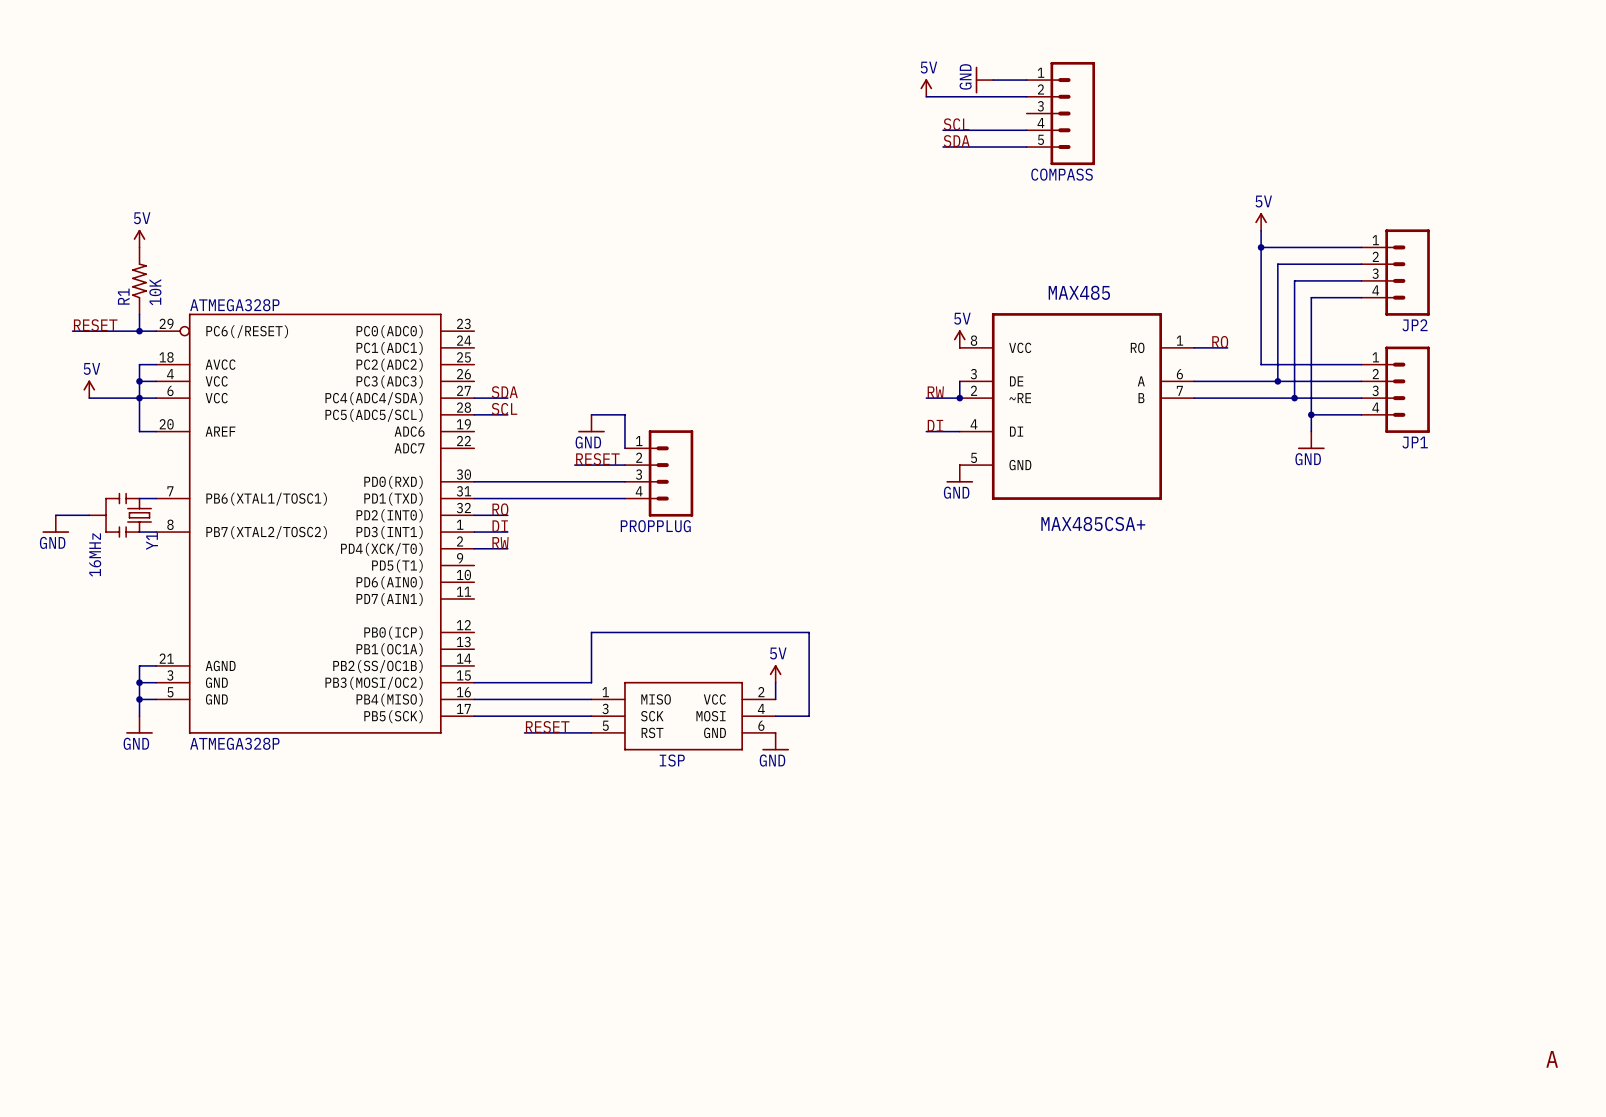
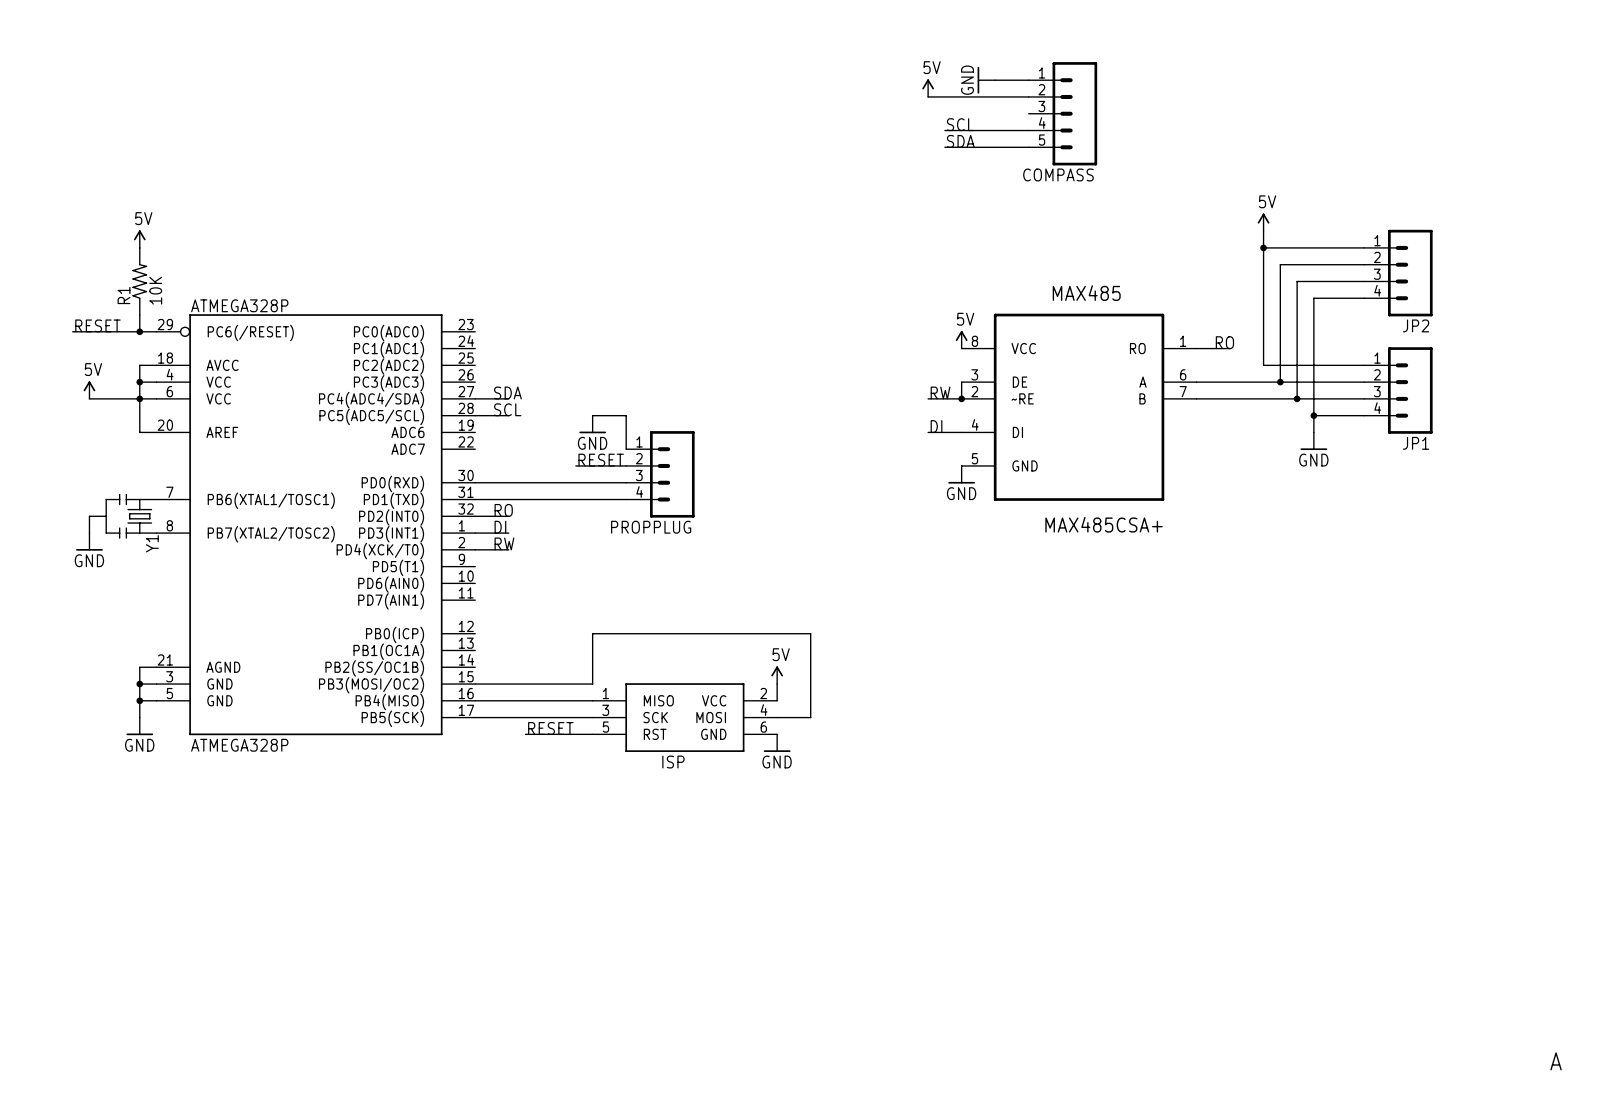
wire: (55, 515) (89, 515) -> (89, 533) (89, 516)
power symbol position: GND (55, 524) -> GND (89, 541)
Y1 value: 16MHz (95, 554) -> none

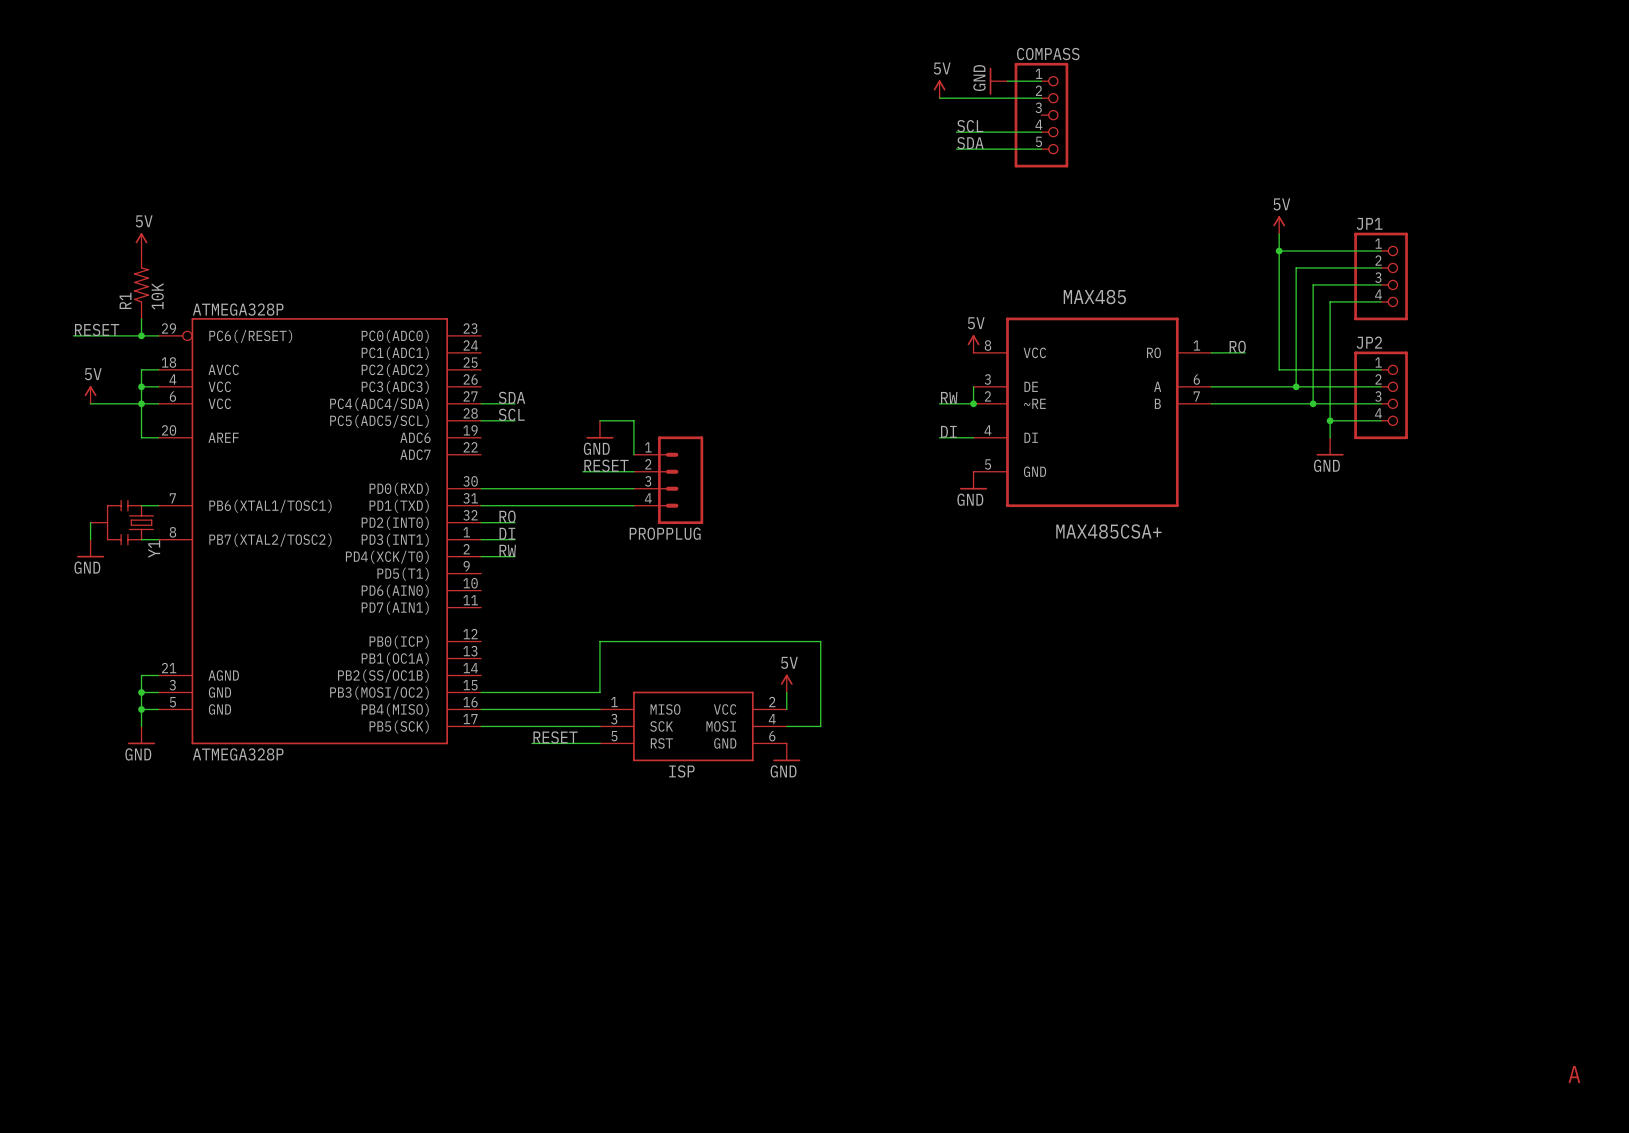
COMPASS: none -> (1041, 115)
COMPASS: (1062, 113) -> none
JP2 symbol: [1364, 229, 1433, 317] -> [1354, 351, 1408, 440]
JP2 name position: JP2 (1416, 325) -> JP2 (1369, 342)
JP1 symbol: [1364, 347, 1433, 434] -> [1354, 232, 1408, 321]
JP1 name position: JP1 (1416, 443) -> JP1 (1369, 223)

